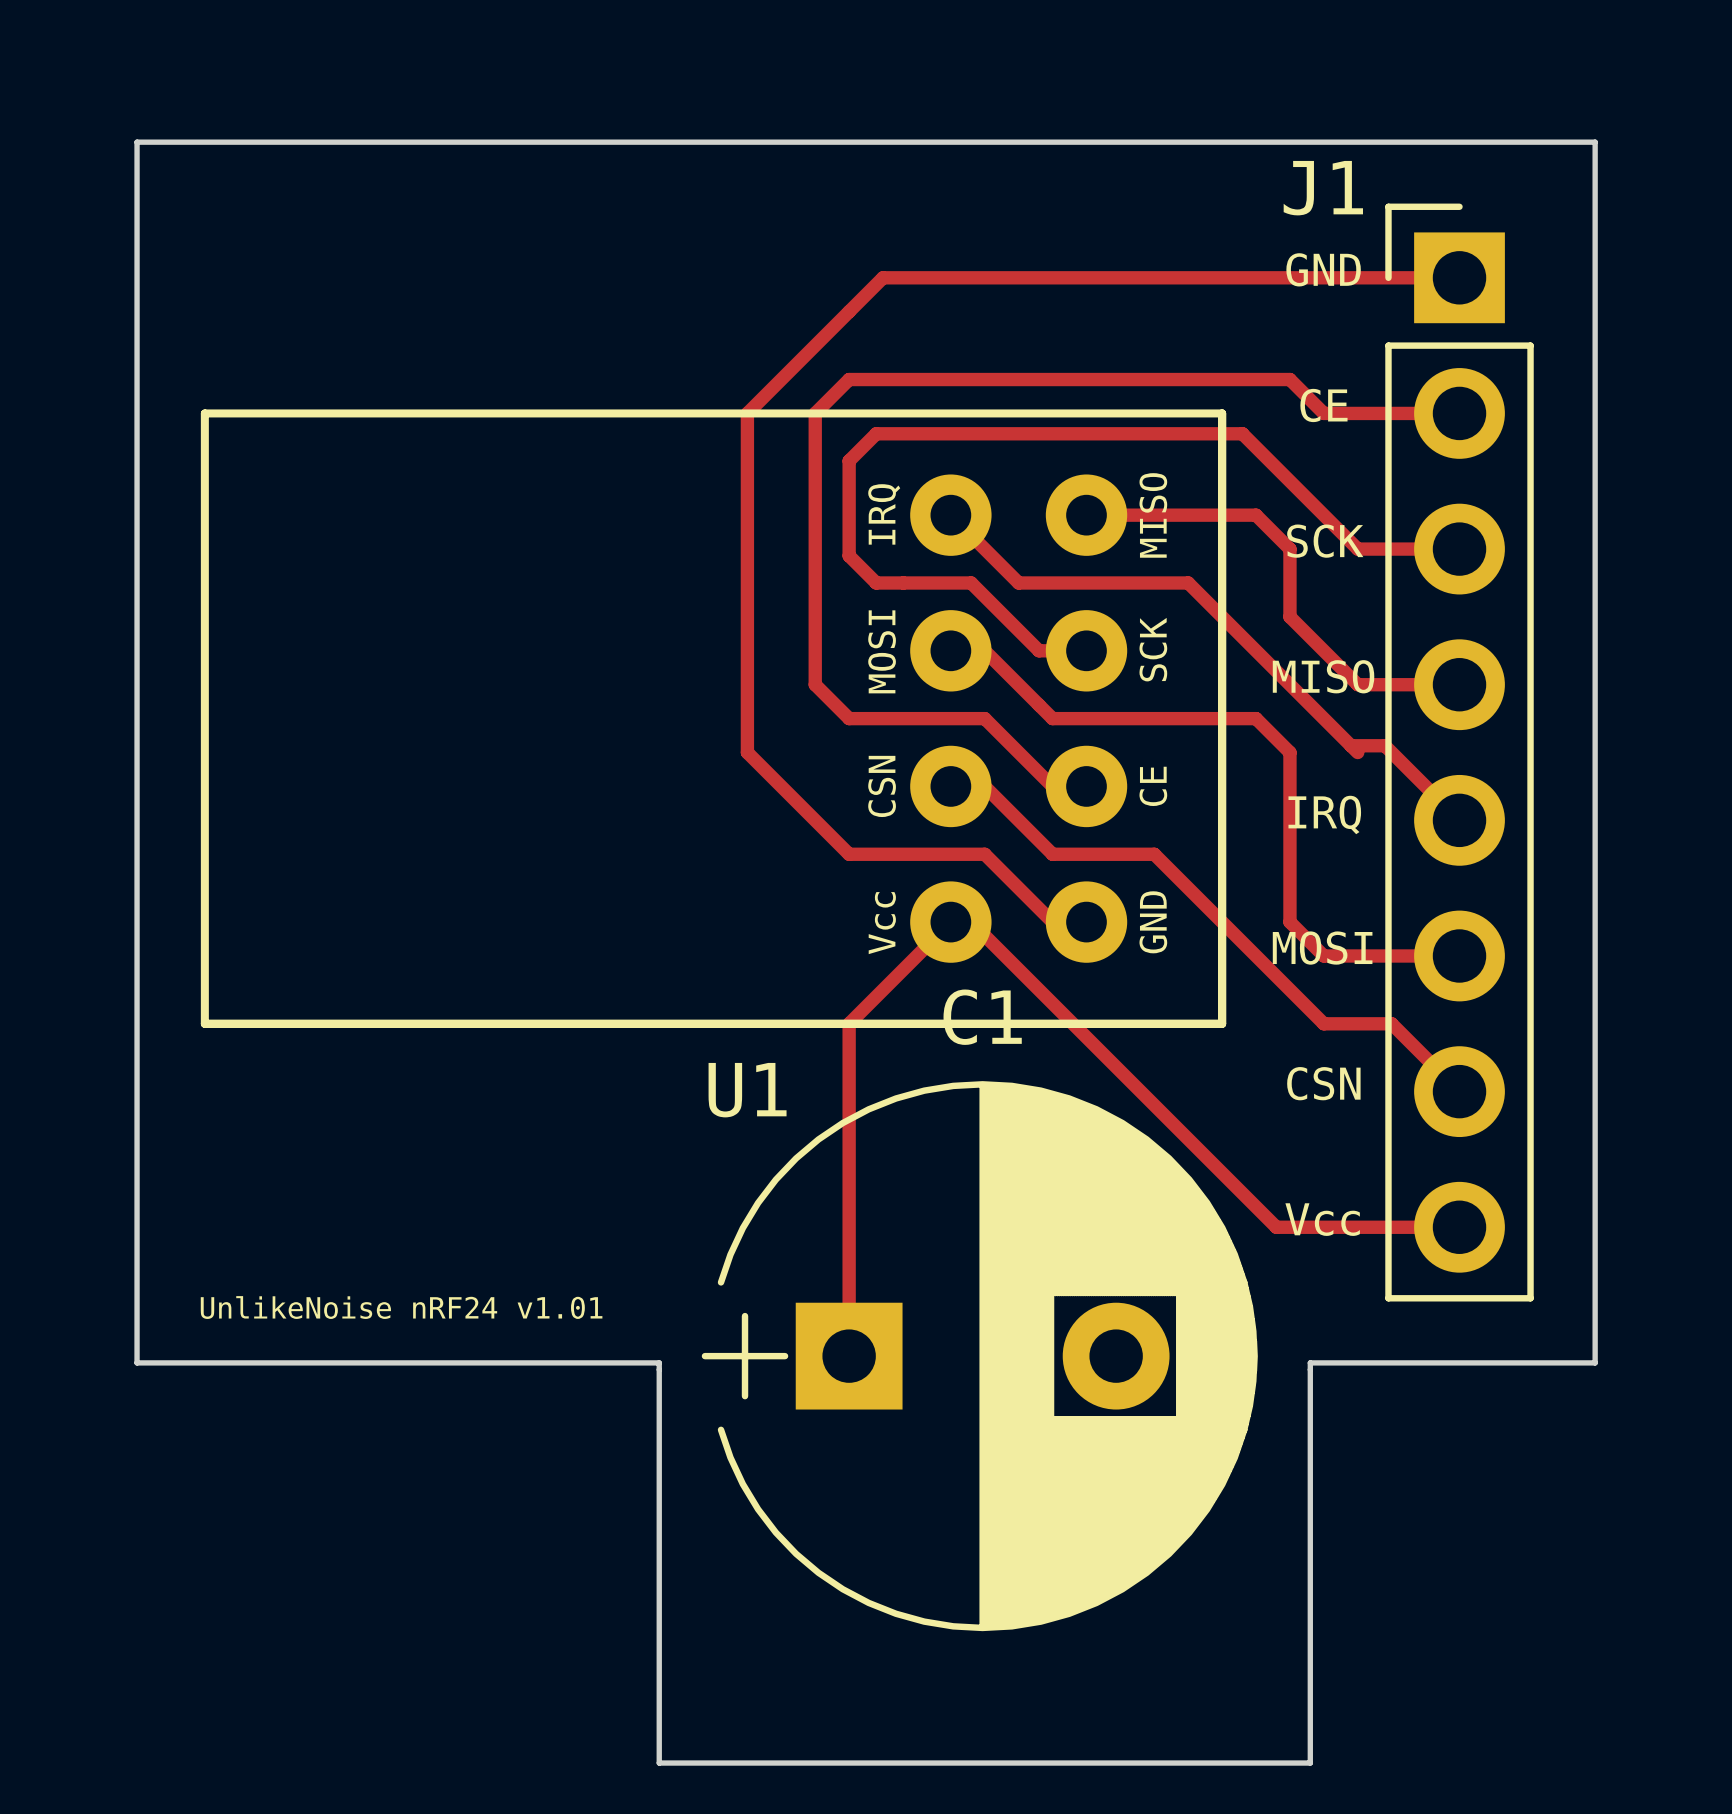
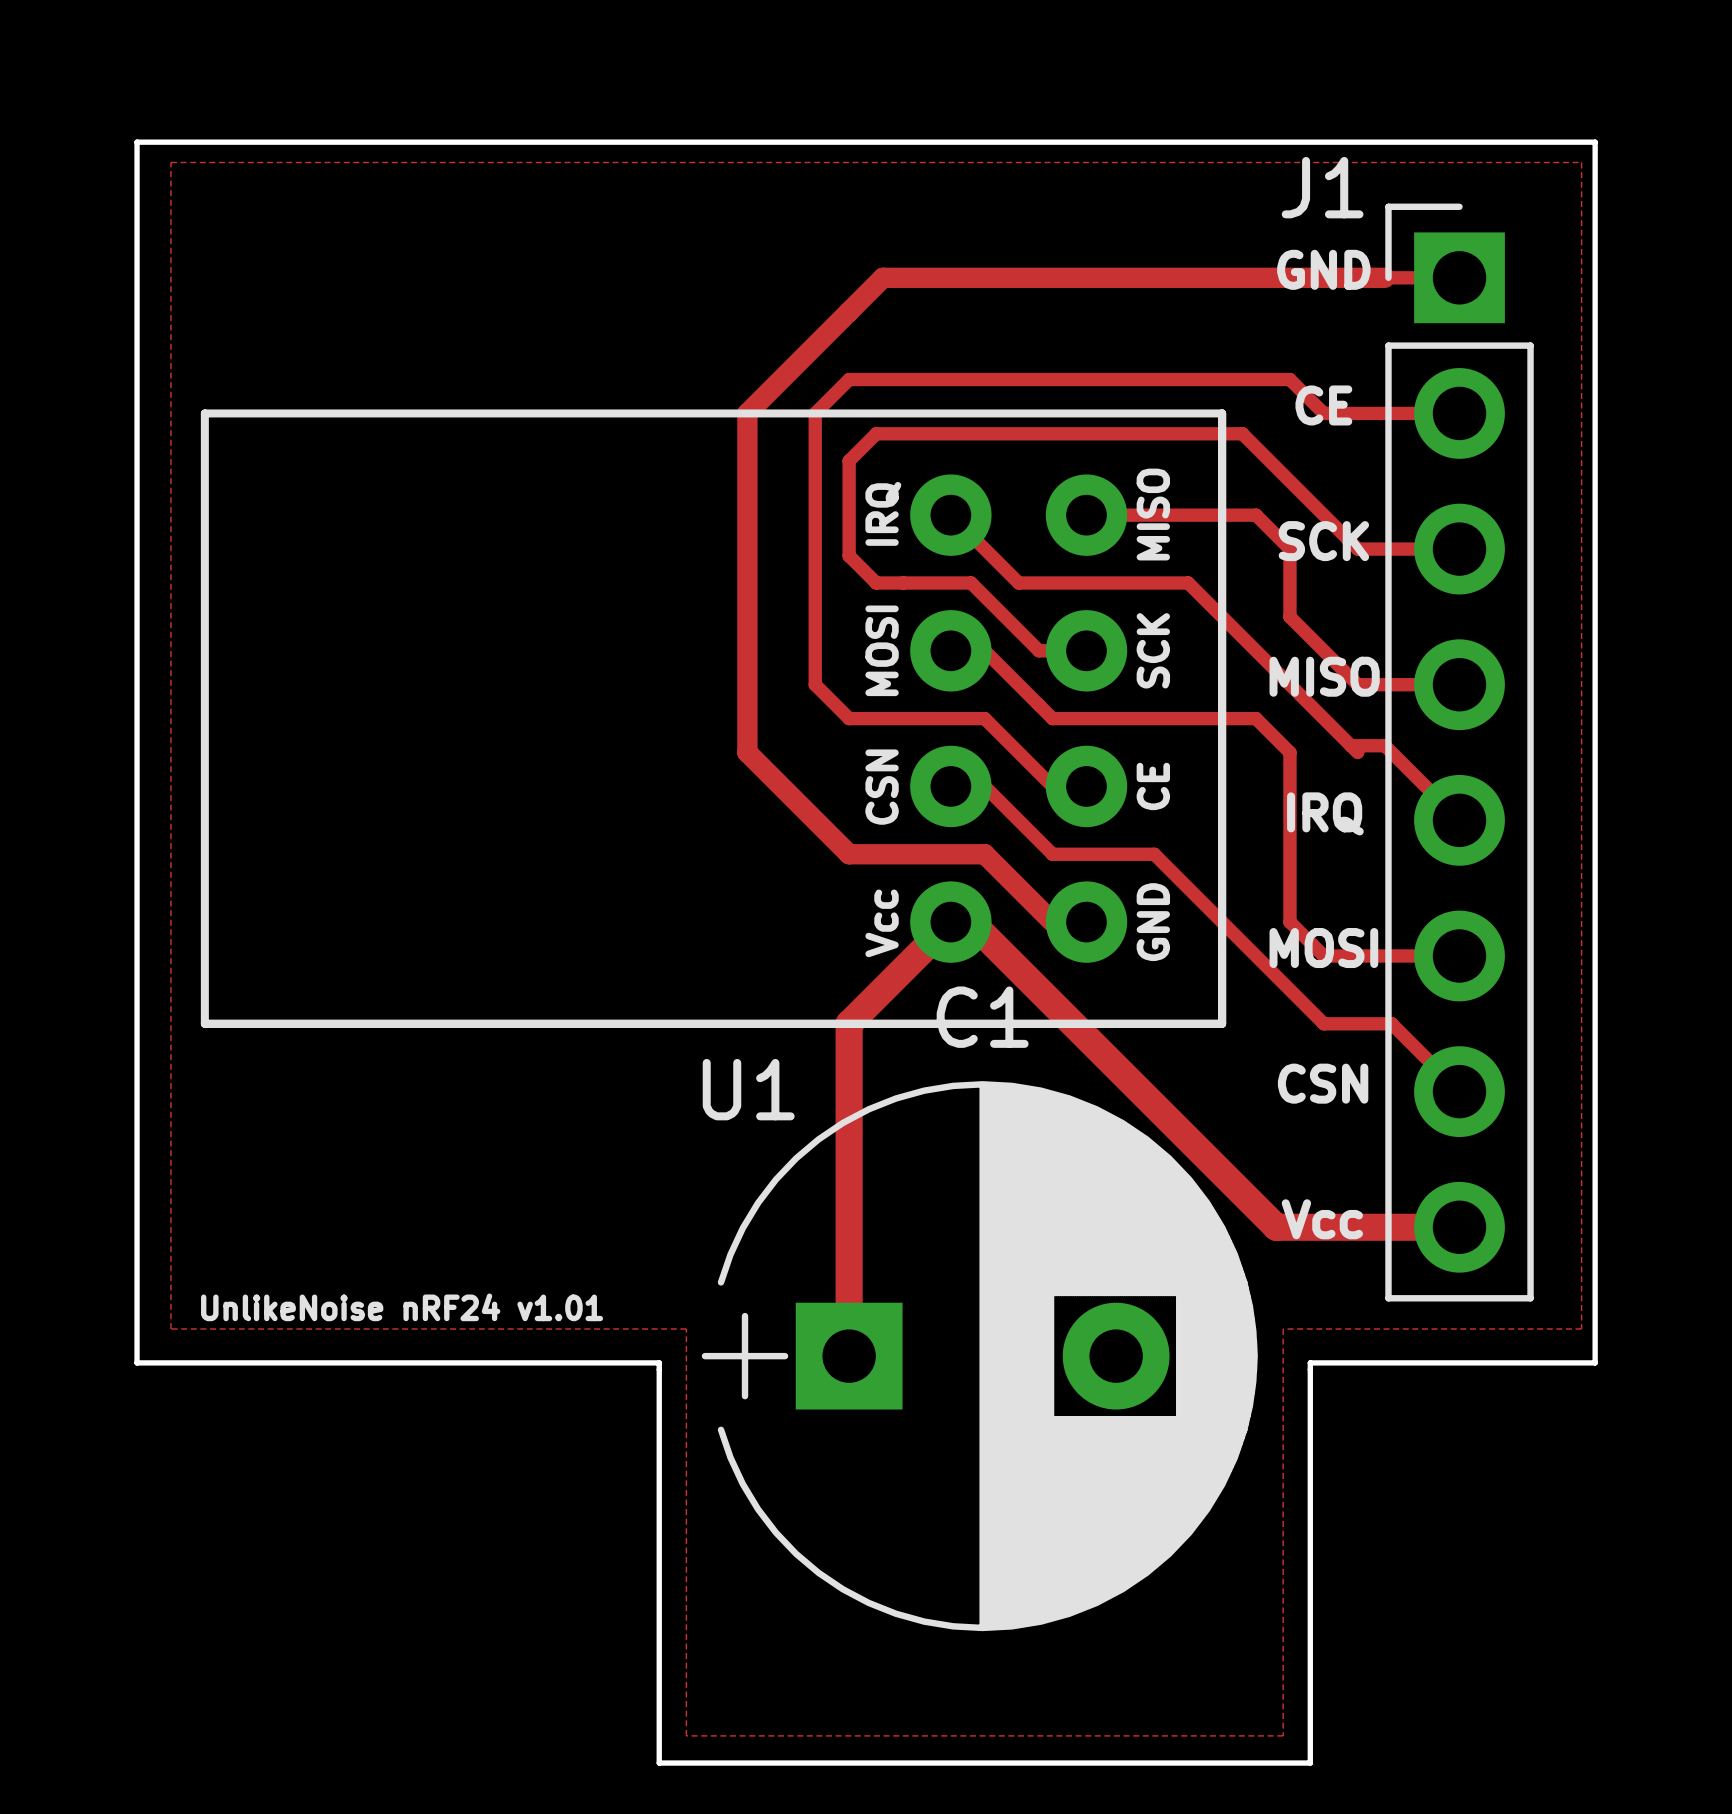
top zone outline: none -> (170, 162) (170, 1328) (686, 1328) (686, 1735) (1283, 1735) (1283, 1328) (1581, 1328) (1581, 162) (170, 162)
top track width: thin (1384, 277) (883, 277) (747, 413) (747, 752) (849, 854) (984, 854) (1052, 922) -> thick (1384, 277) (883, 277) (747, 413) (747, 752) (849, 854) (984, 854) (1052, 922)
top track width: thin (1459, 1227) (1276, 1227) (971, 922) (950, 922) (849, 1023) (849, 1356) -> thick (1459, 1227) (1276, 1227) (971, 922) (950, 922) (849, 1023) (849, 1356)

